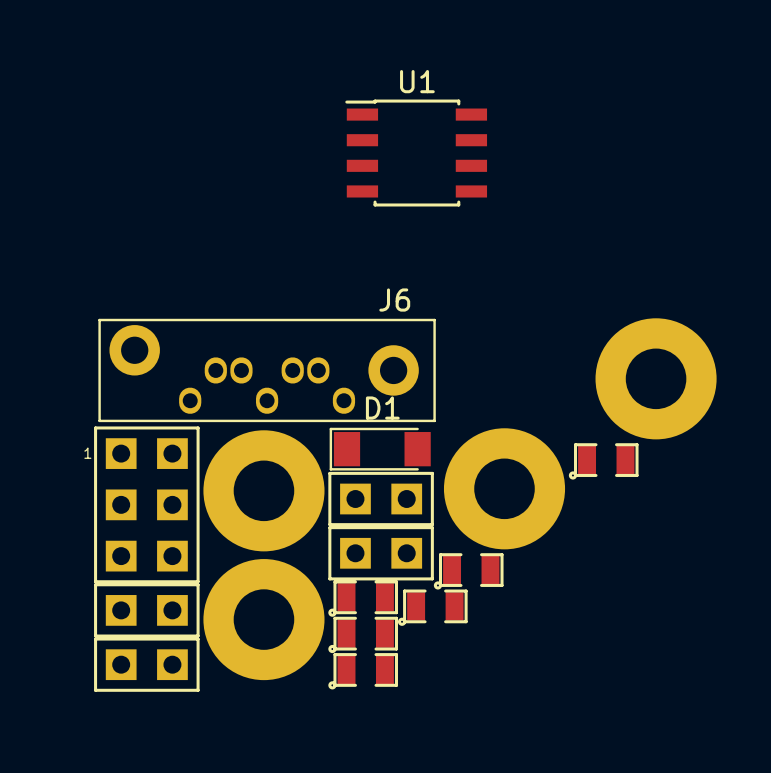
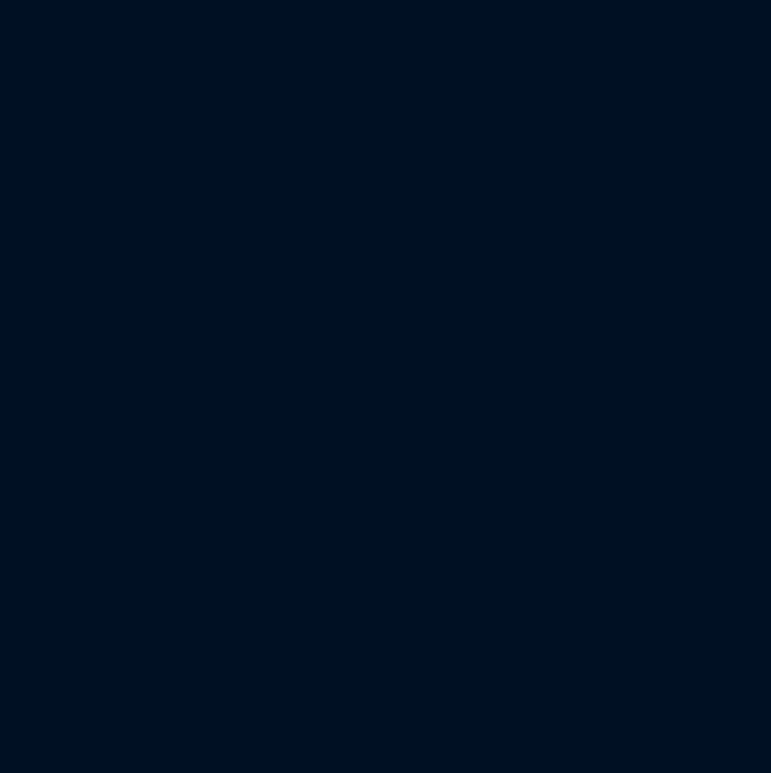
U1: (416, 153) -> none
J6: (267, 370) -> none
part: (656, 378) -> none
D1: (380, 449) -> none
part: (603, 461) -> none
part: (504, 488) -> none
part: (263, 490) -> none
part: (381, 499) -> none
part: (146, 504) -> none
part: (381, 553) -> none
part: (468, 571) -> none
part: (363, 598) -> none
part: (432, 607) -> none
part: (146, 610) -> none
part: (263, 619) -> none
part: (363, 634) -> none
part: (146, 664) -> none
part: (363, 671) -> none

